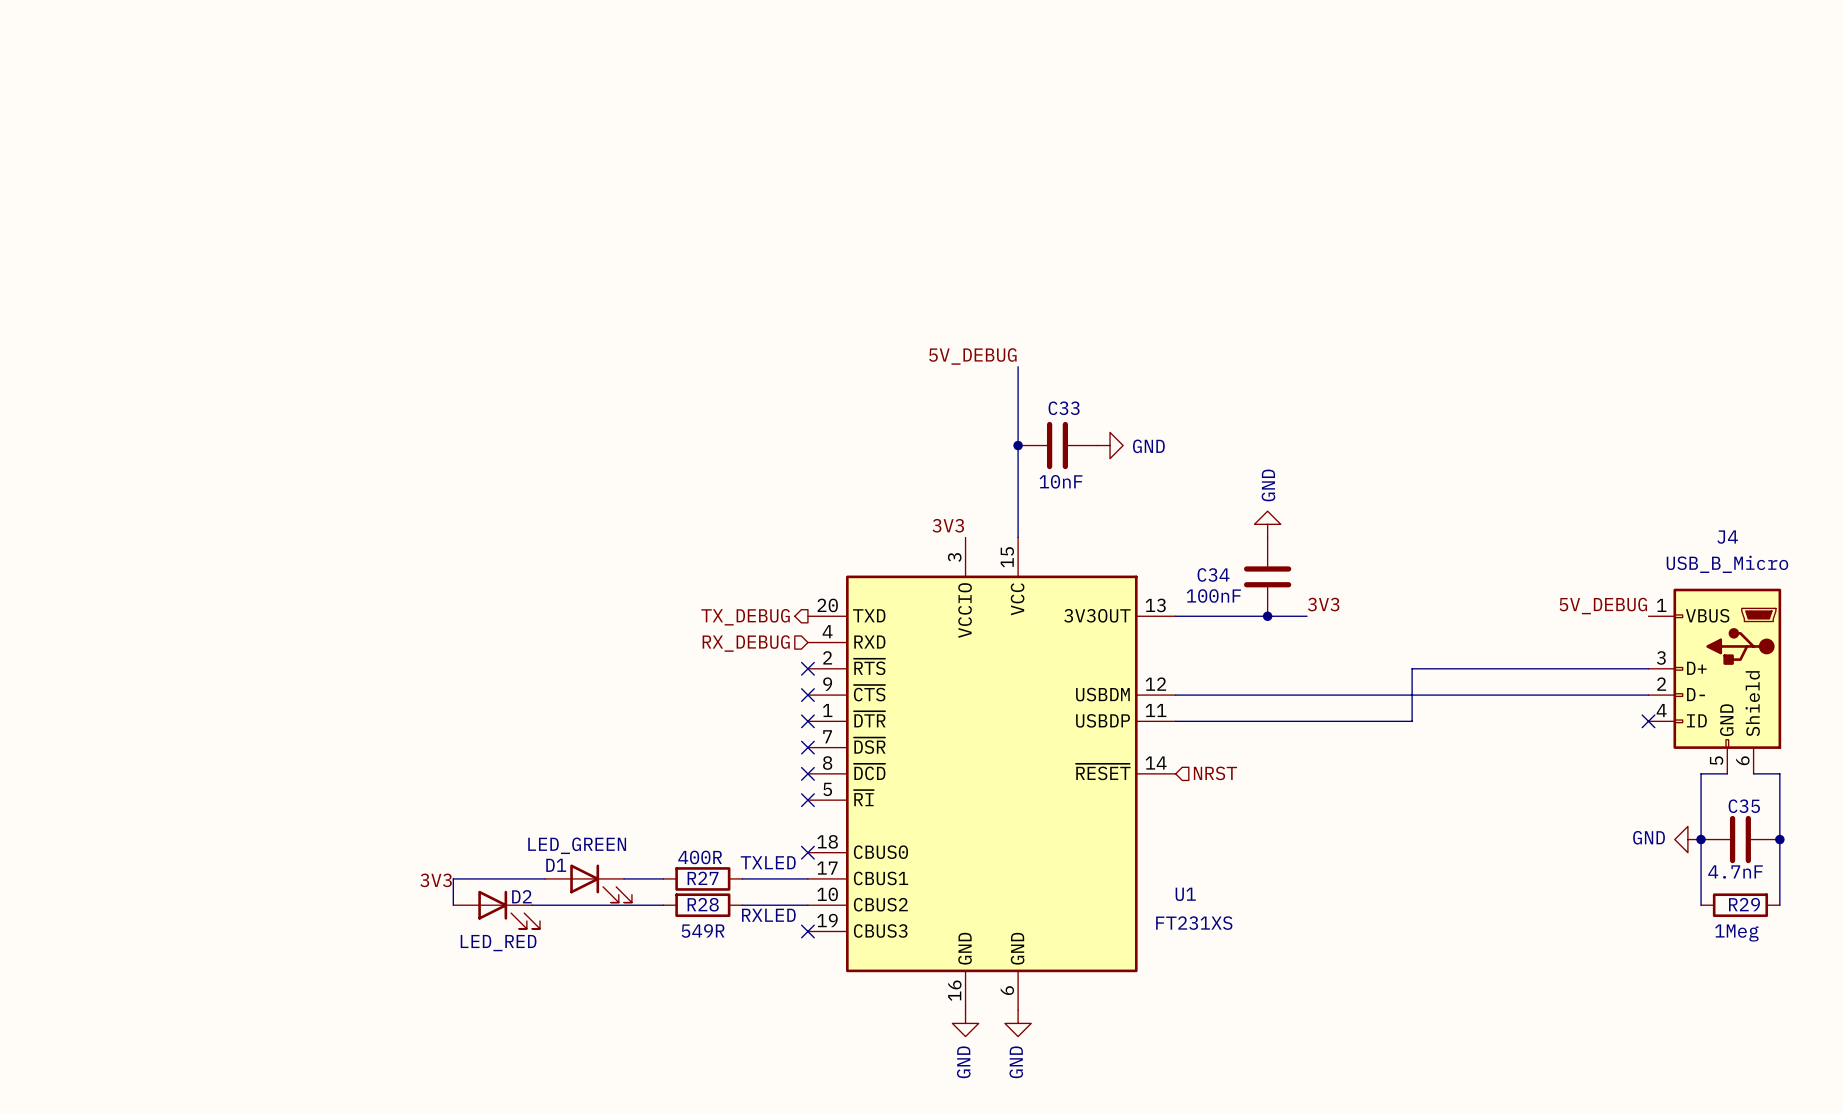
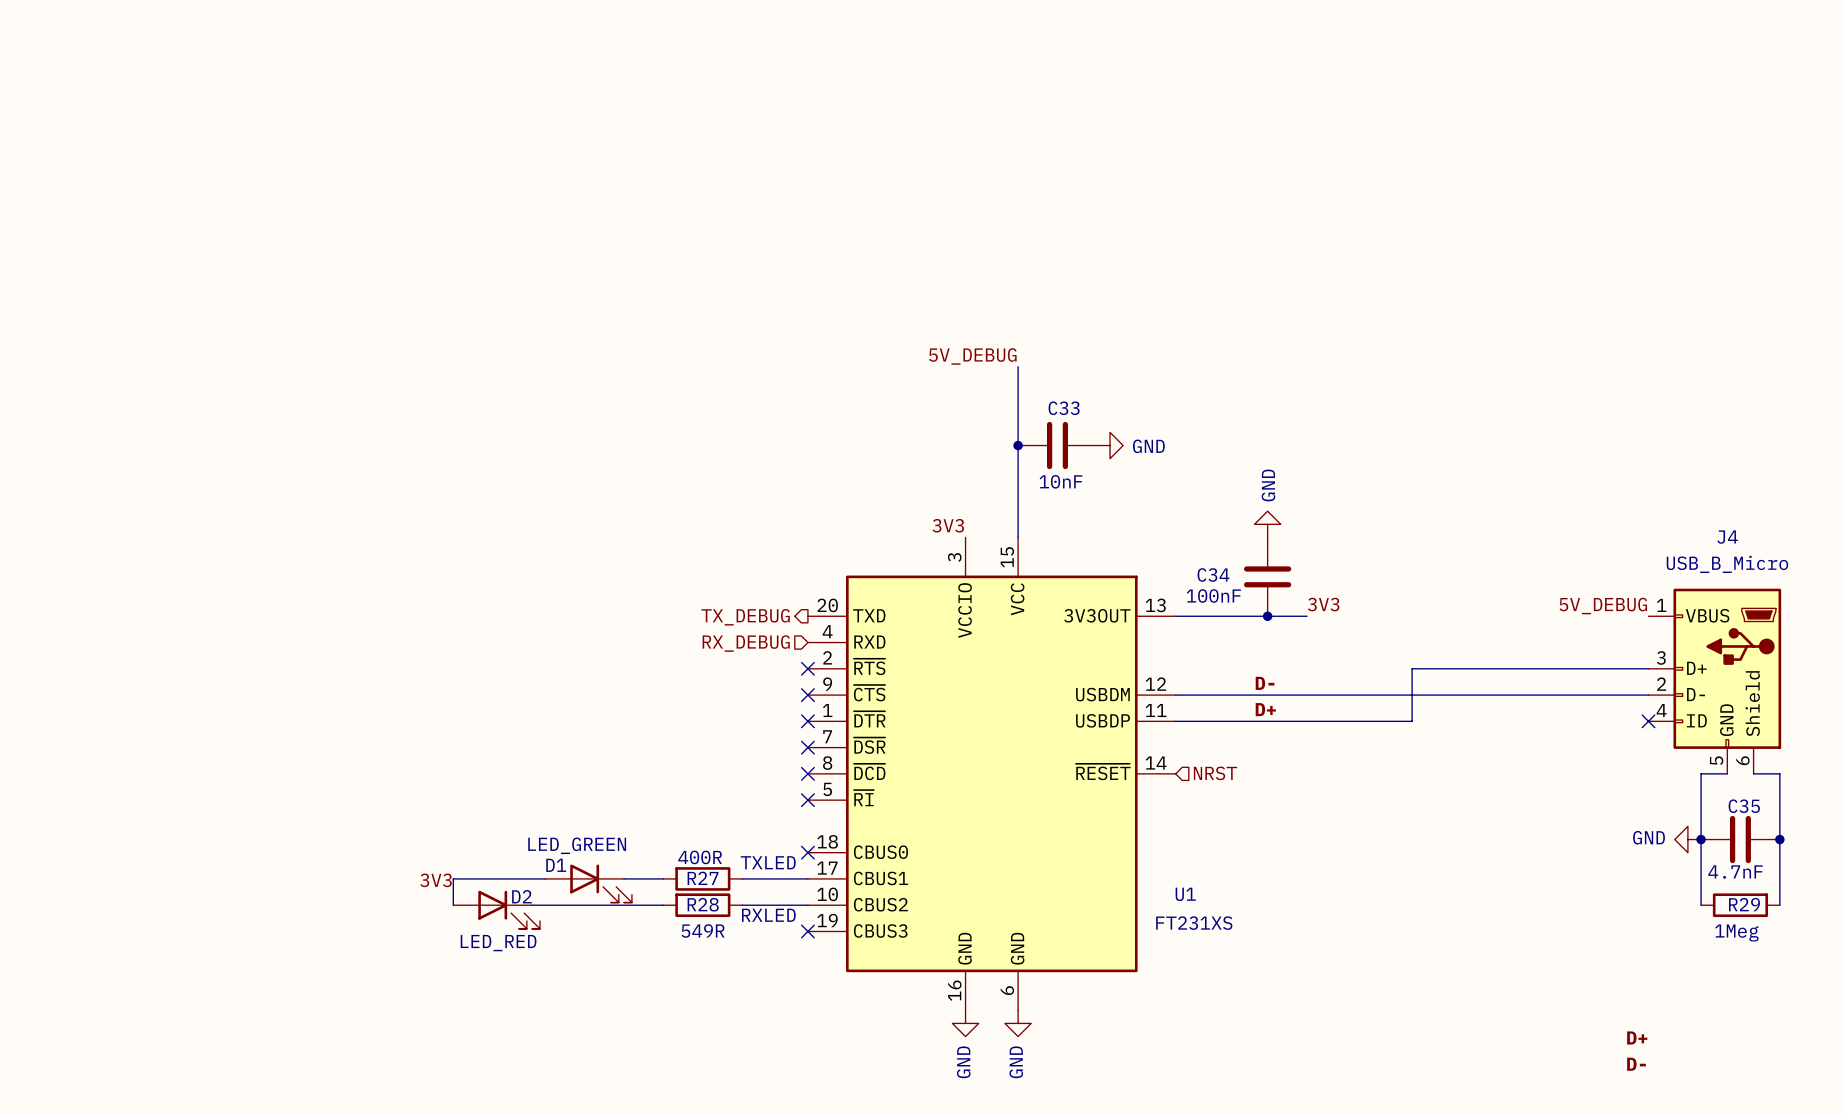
label: none -> D- (1265, 683)
label: none -> D+ (1265, 709)
label: none -> D+ (1637, 1037)
label: none -> D- (1636, 1064)

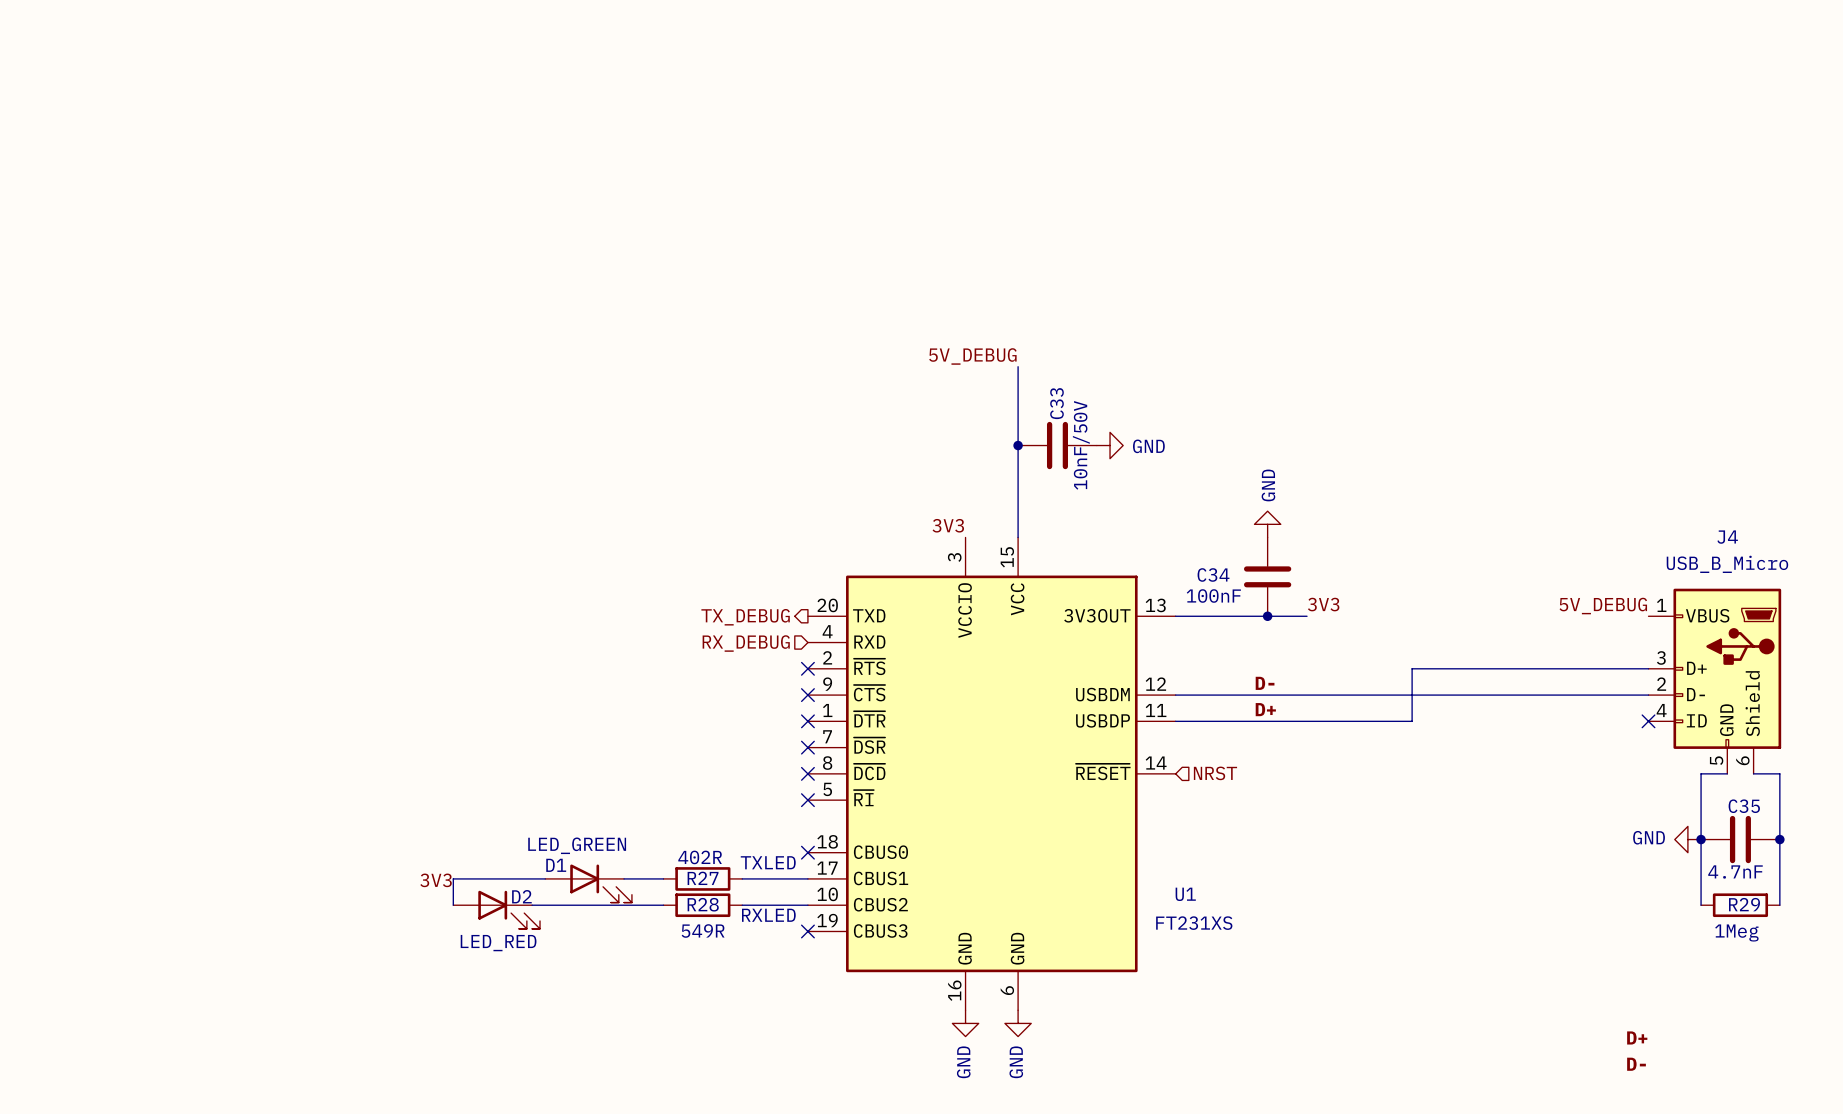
C33 name rotation: 0° (1064, 408) -> 90° counterclockwise (1056, 403)
C33 value: 10nF (1061, 481) -> 10nF/50V (1081, 445)
R27 value: 400R (700, 857) -> 402R (700, 857)

